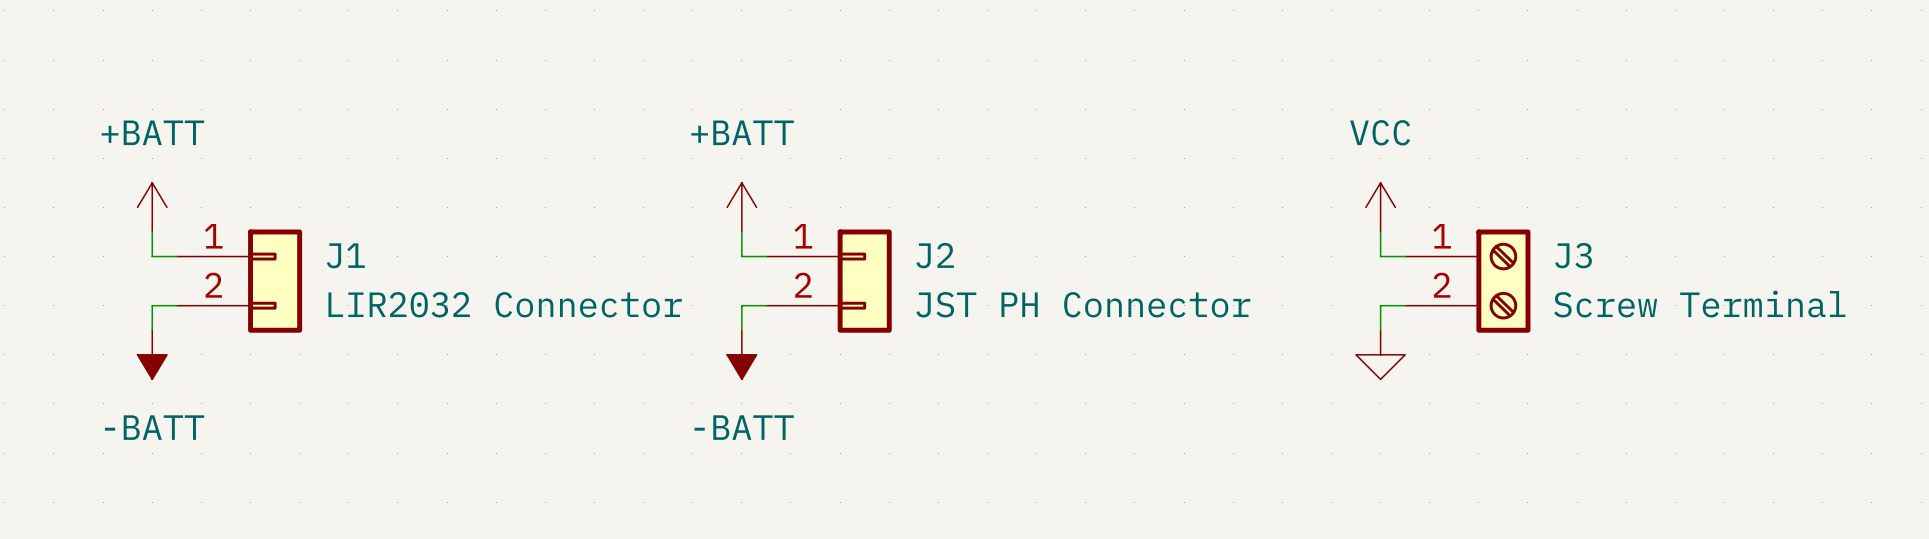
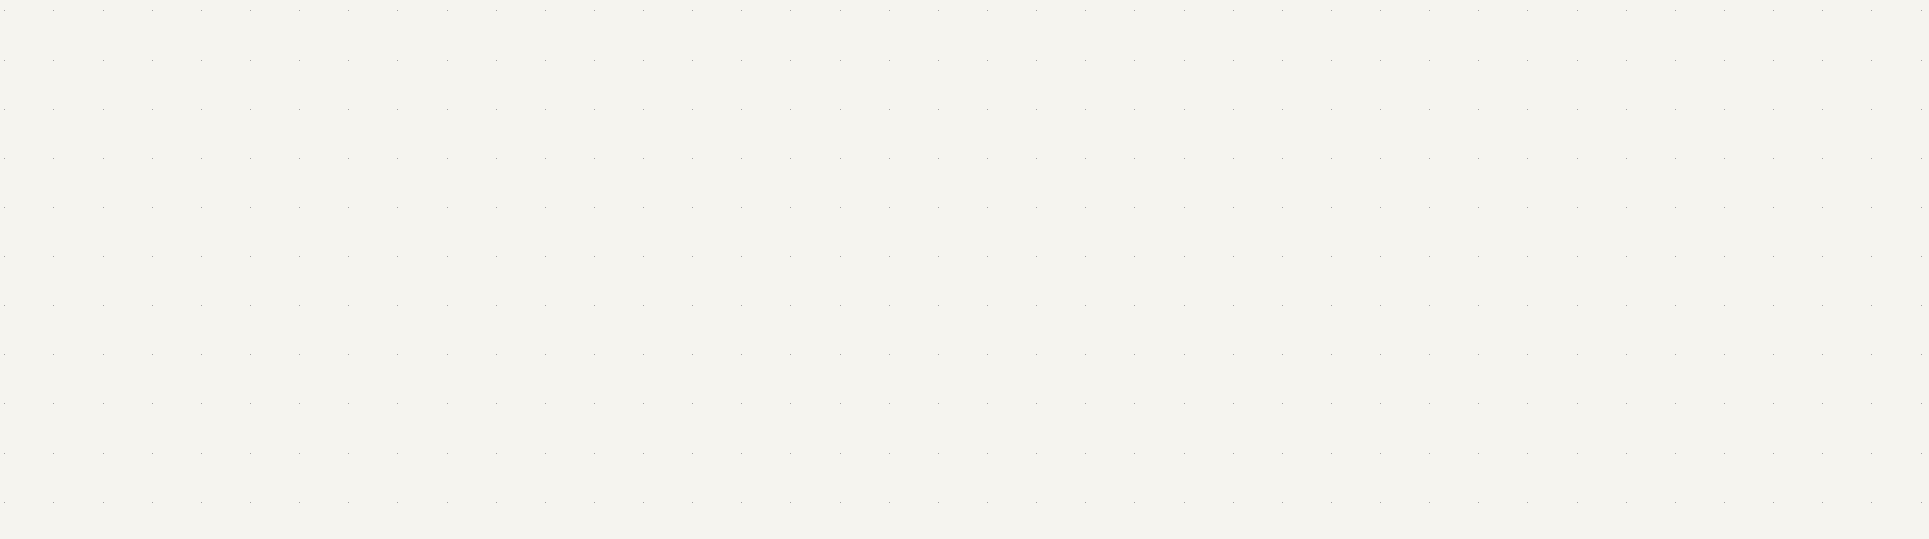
power symbol: +BATT (152, 207) -> none
power symbol: +BATT (741, 207) -> none
power symbol: VCC (1380, 207) -> none
wire: (152, 231) (152, 256) (176, 256) -> none
wire: (741, 231) (741, 256) (766, 256) -> none
wire: (1380, 231) (1380, 256) (1405, 256) -> none
J1: LIR2032 Connector (239, 281) -> none
J2: JST PH Connector (829, 281) -> none
J3: Screw Terminal (1467, 281) -> none
wire: (176, 305) (152, 305) (152, 330) -> none
wire: (766, 305) (741, 305) (741, 330) -> none
wire: (1405, 305) (1380, 305) (1380, 330) -> none
power symbol: -BATT (152, 354) -> none
power symbol: -BATT (741, 354) -> none
power symbol: (1380, 354) -> none

